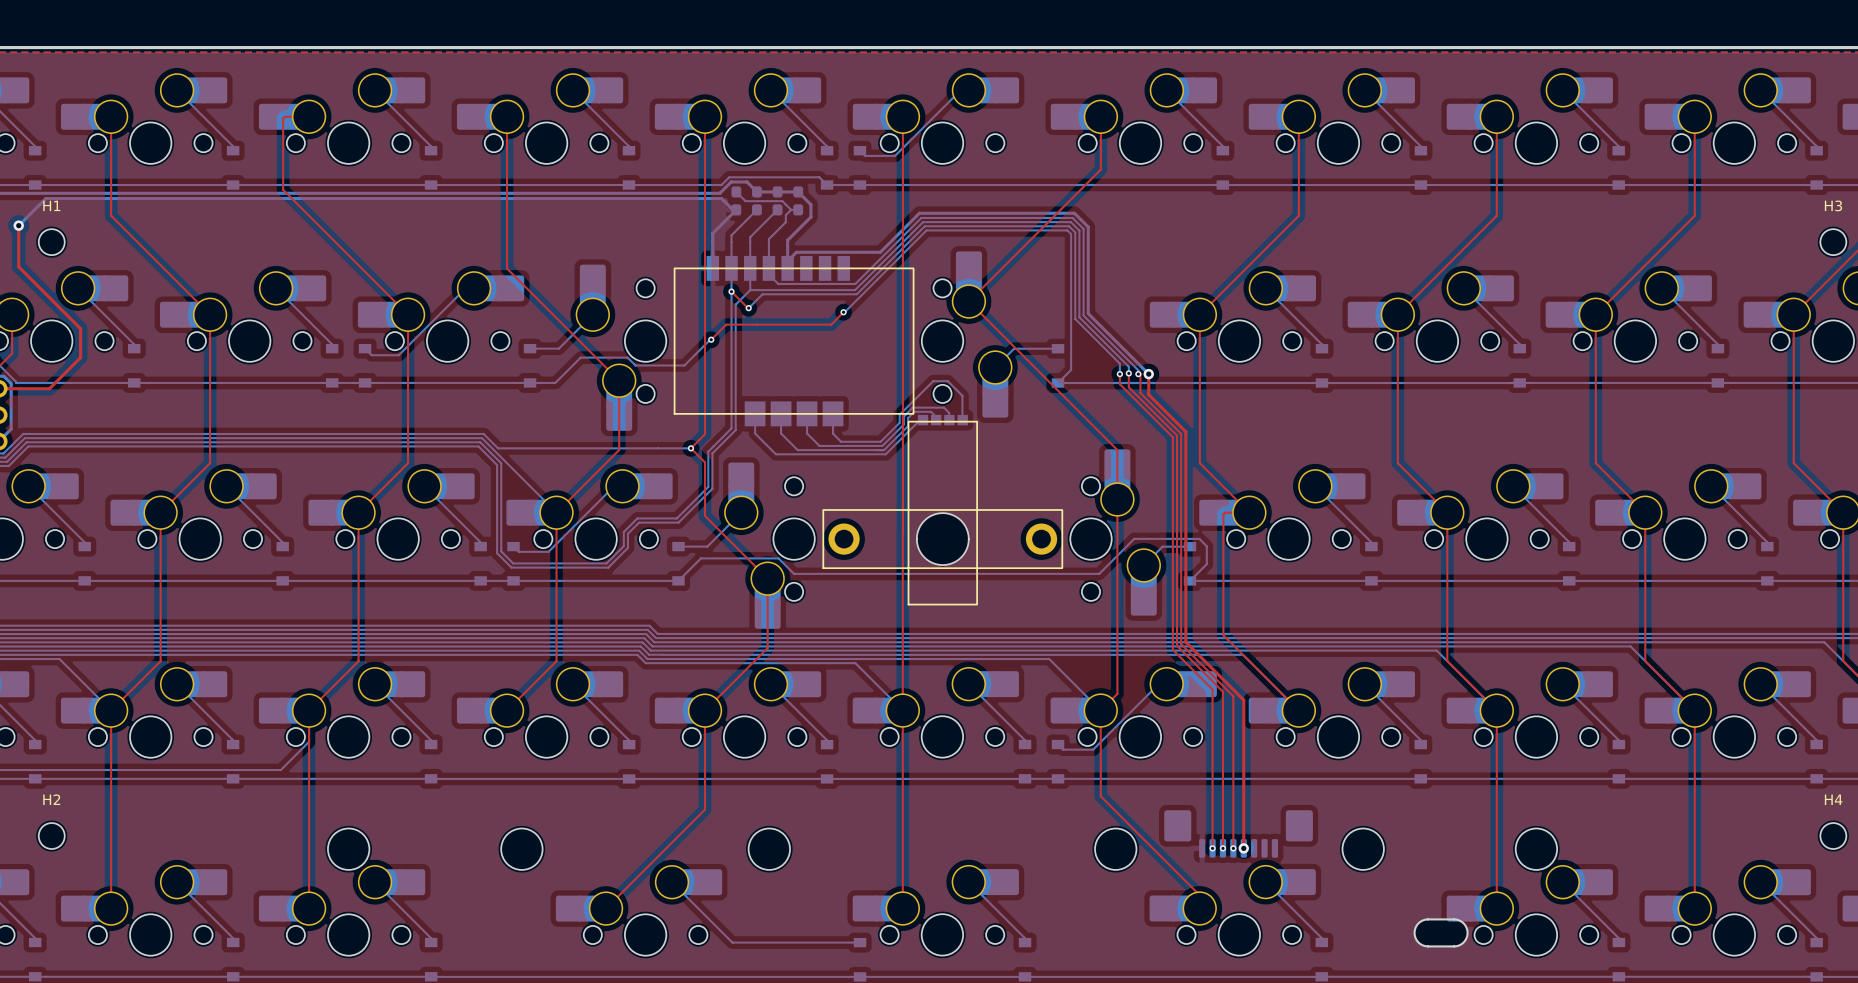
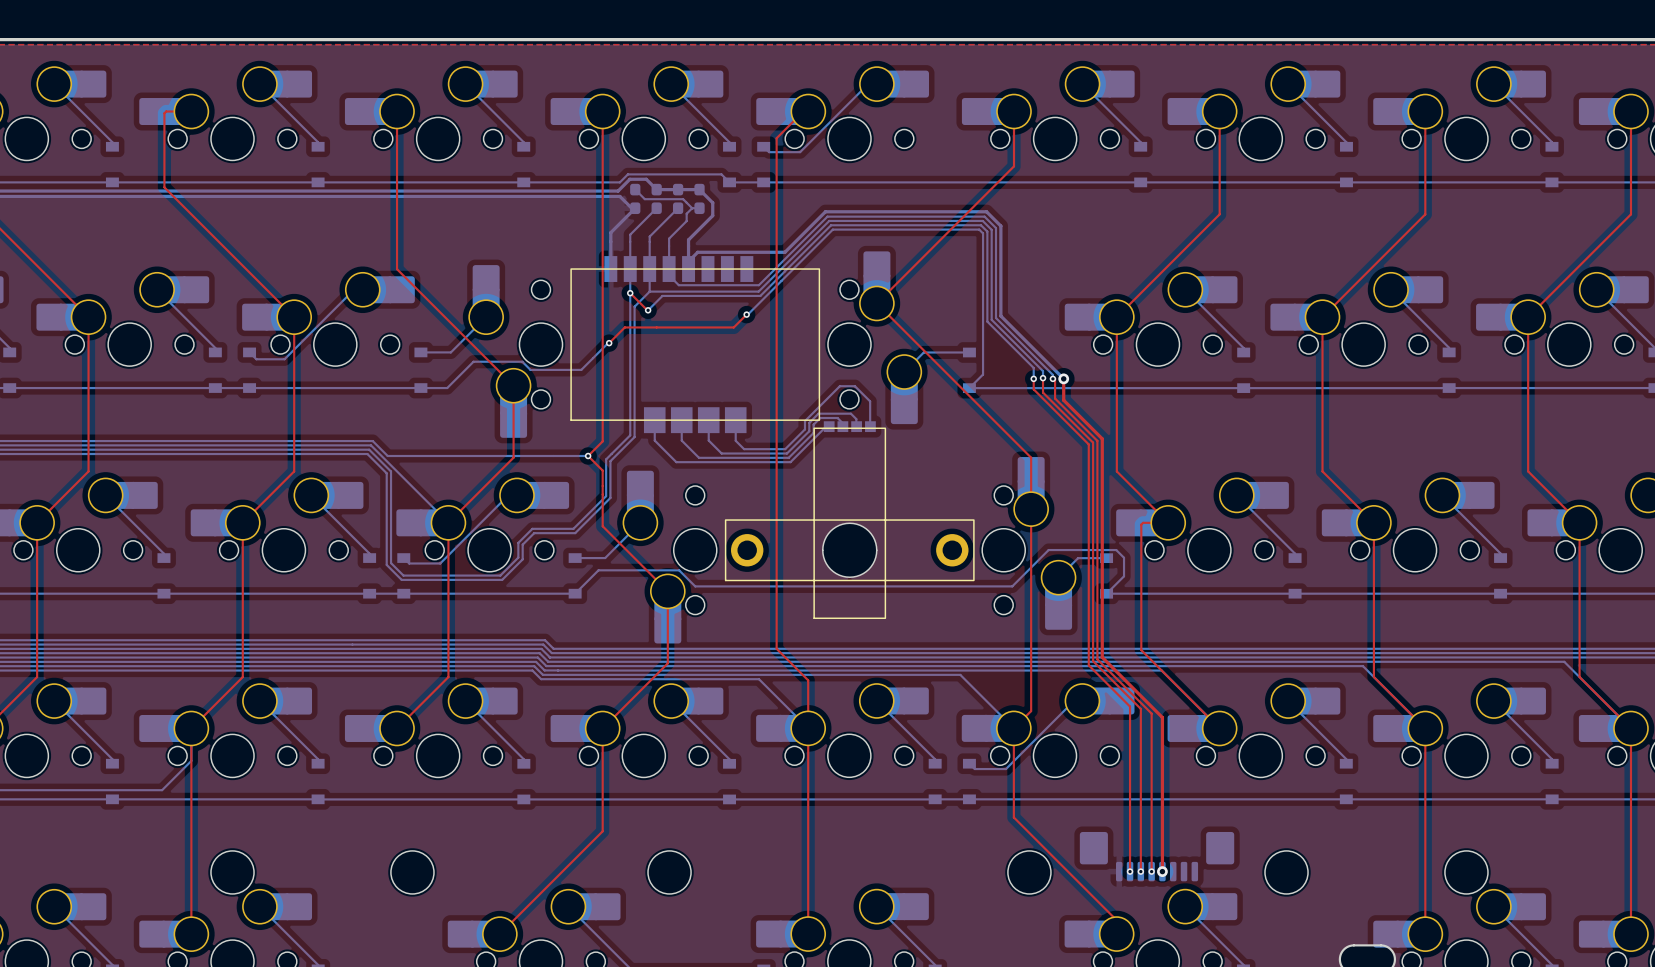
top track: (902, 116) (902, 532) -> (808, 111) (803, 111) (776, 138) (776, 648) (808, 680)
top track: (902, 532) (902, 664) -> none

